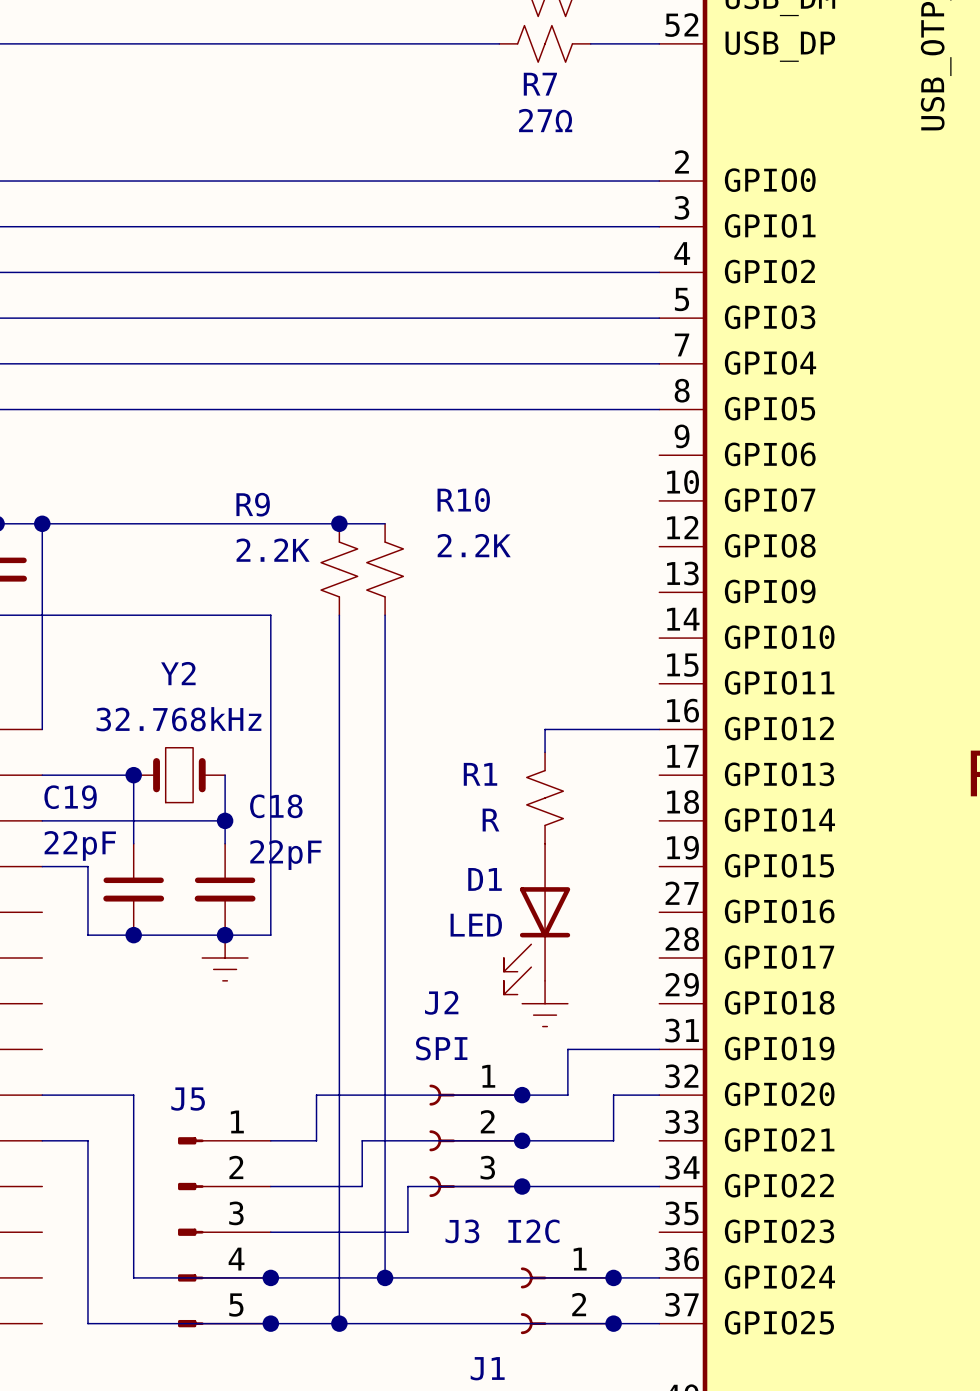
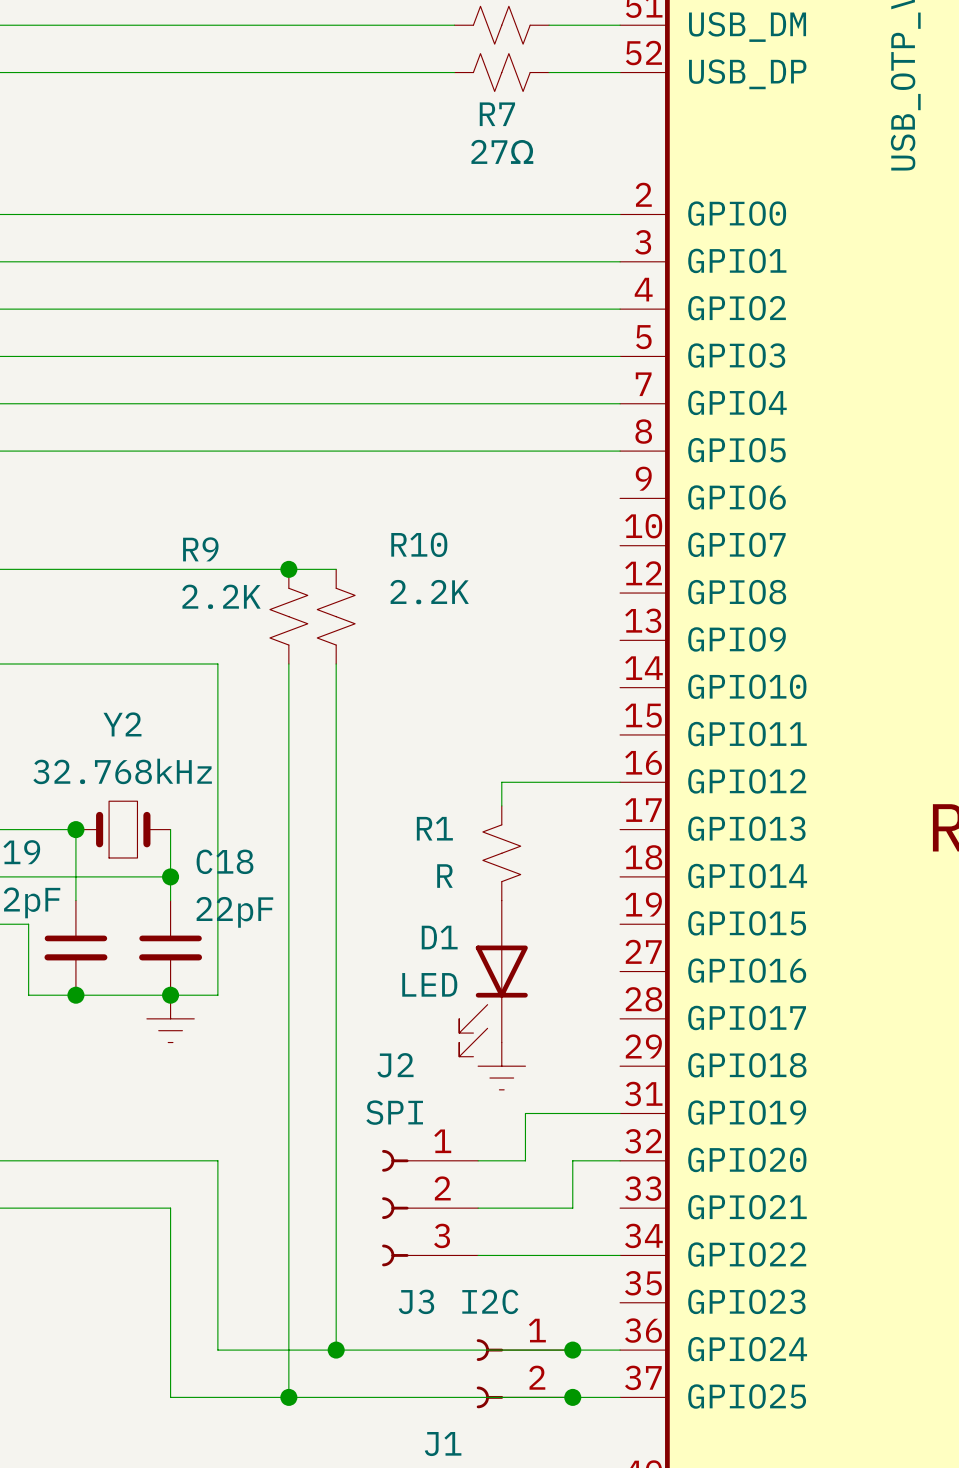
wire: (133, 1095) (133, 1277) (270, 1277) -> (75, 1160) (217, 1160) (217, 1350)
wire: (522, 1095) (316, 1095) (316, 1140) (270, 1140) -> none
junction: (522, 1095) -> none
wire: (87, 1140) (87, 1323) (225, 1323) -> (28, 1208) (170, 1208) (170, 1397)
wire: (522, 1140) (362, 1140) (362, 1186) (270, 1186) -> none
junction: (522, 1140) -> none
wire: (522, 1186) (407, 1186) (407, 1232) (270, 1232) -> none
junction: (522, 1186) -> none
J5: (224, 1232) -> none
junction: (270, 1277) -> none
junction: (270, 1323) -> none

